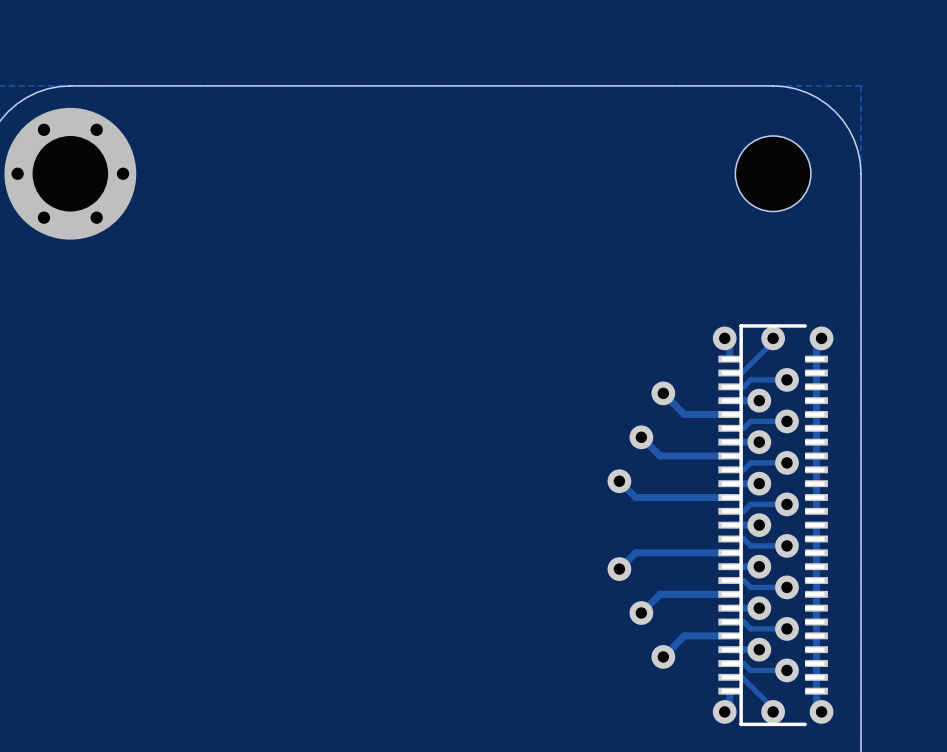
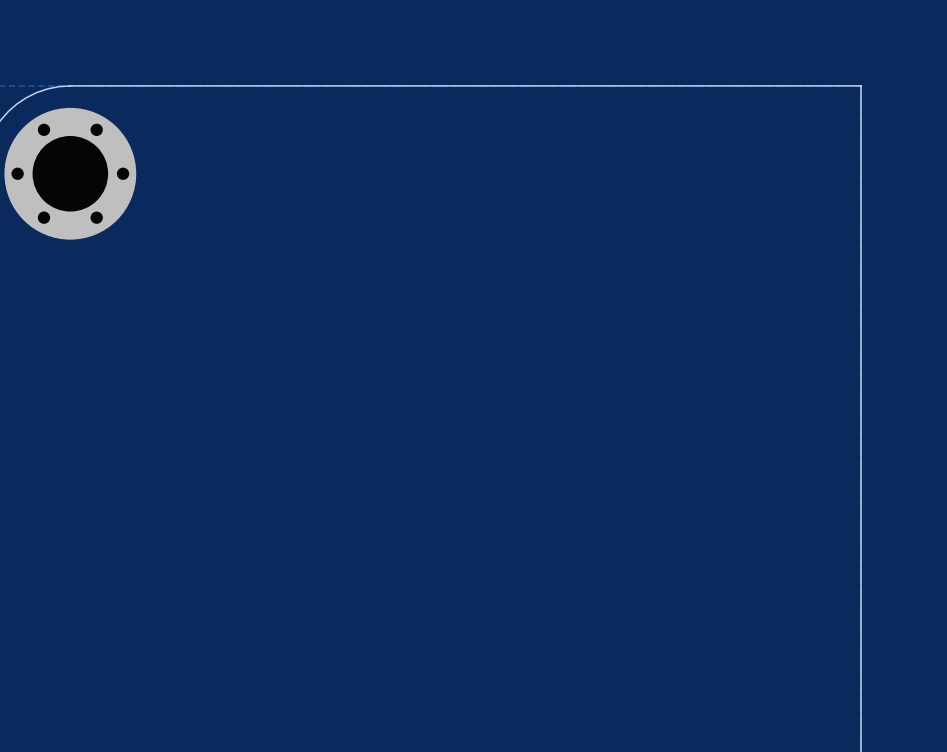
board edge: (773, 85) (795, 88) (806, 92) (835, 111) (854, 140) (858, 151) (861, 173) -> (773, 85) (861, 85) (861, 173)
part: (773, 173) -> none
part: (720, 525) -> none

